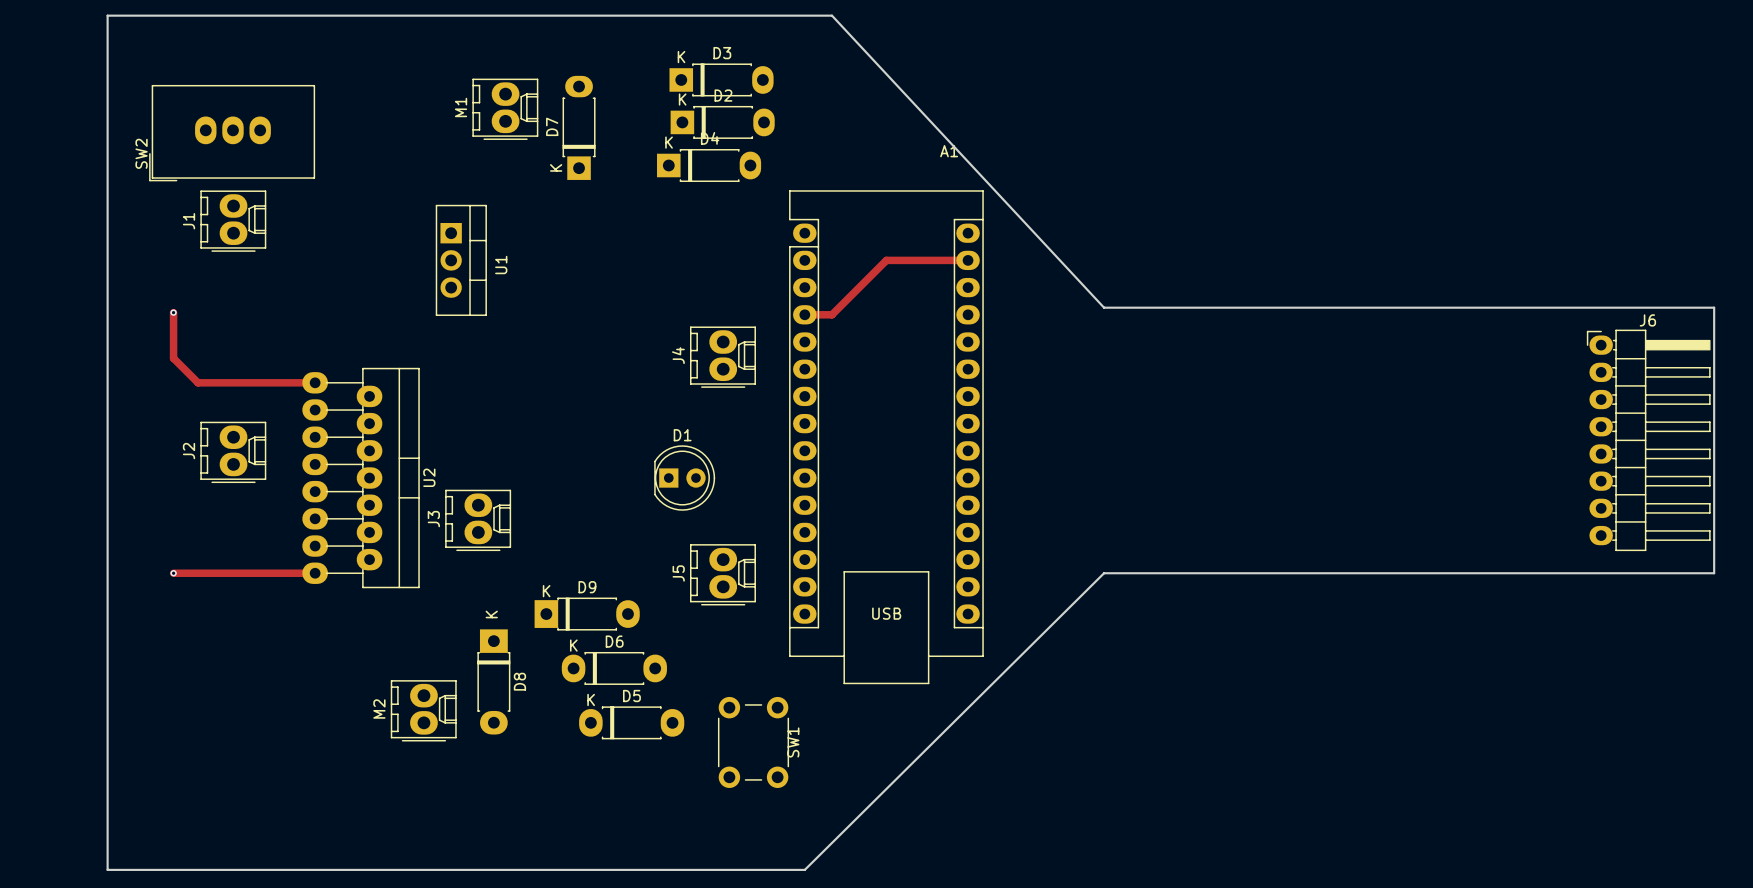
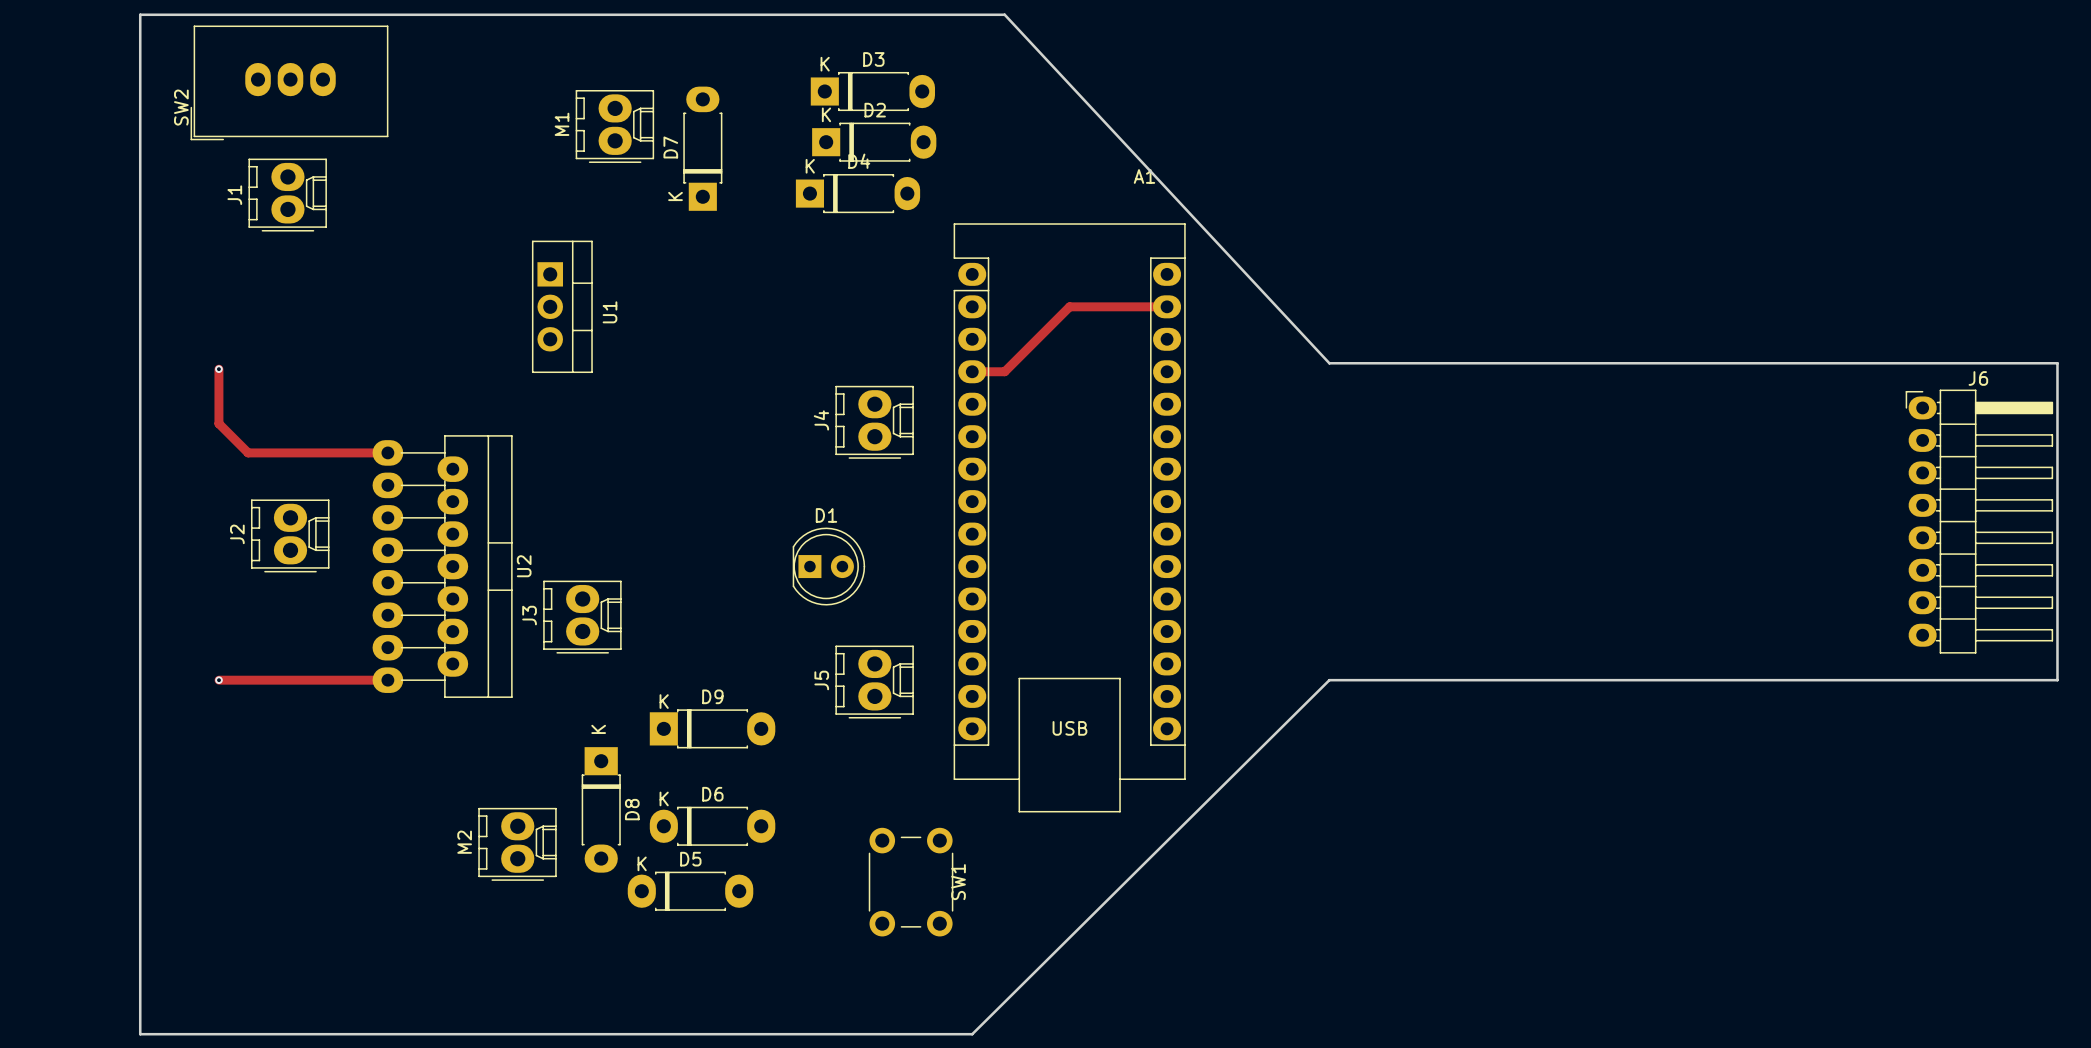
SW2 position: (232, 133) -> (289, 82)
J1 position: (233, 221) -> (287, 195)
D6 position: (614, 668) -> (712, 826)
D5 position: (631, 722) -> (690, 891)

